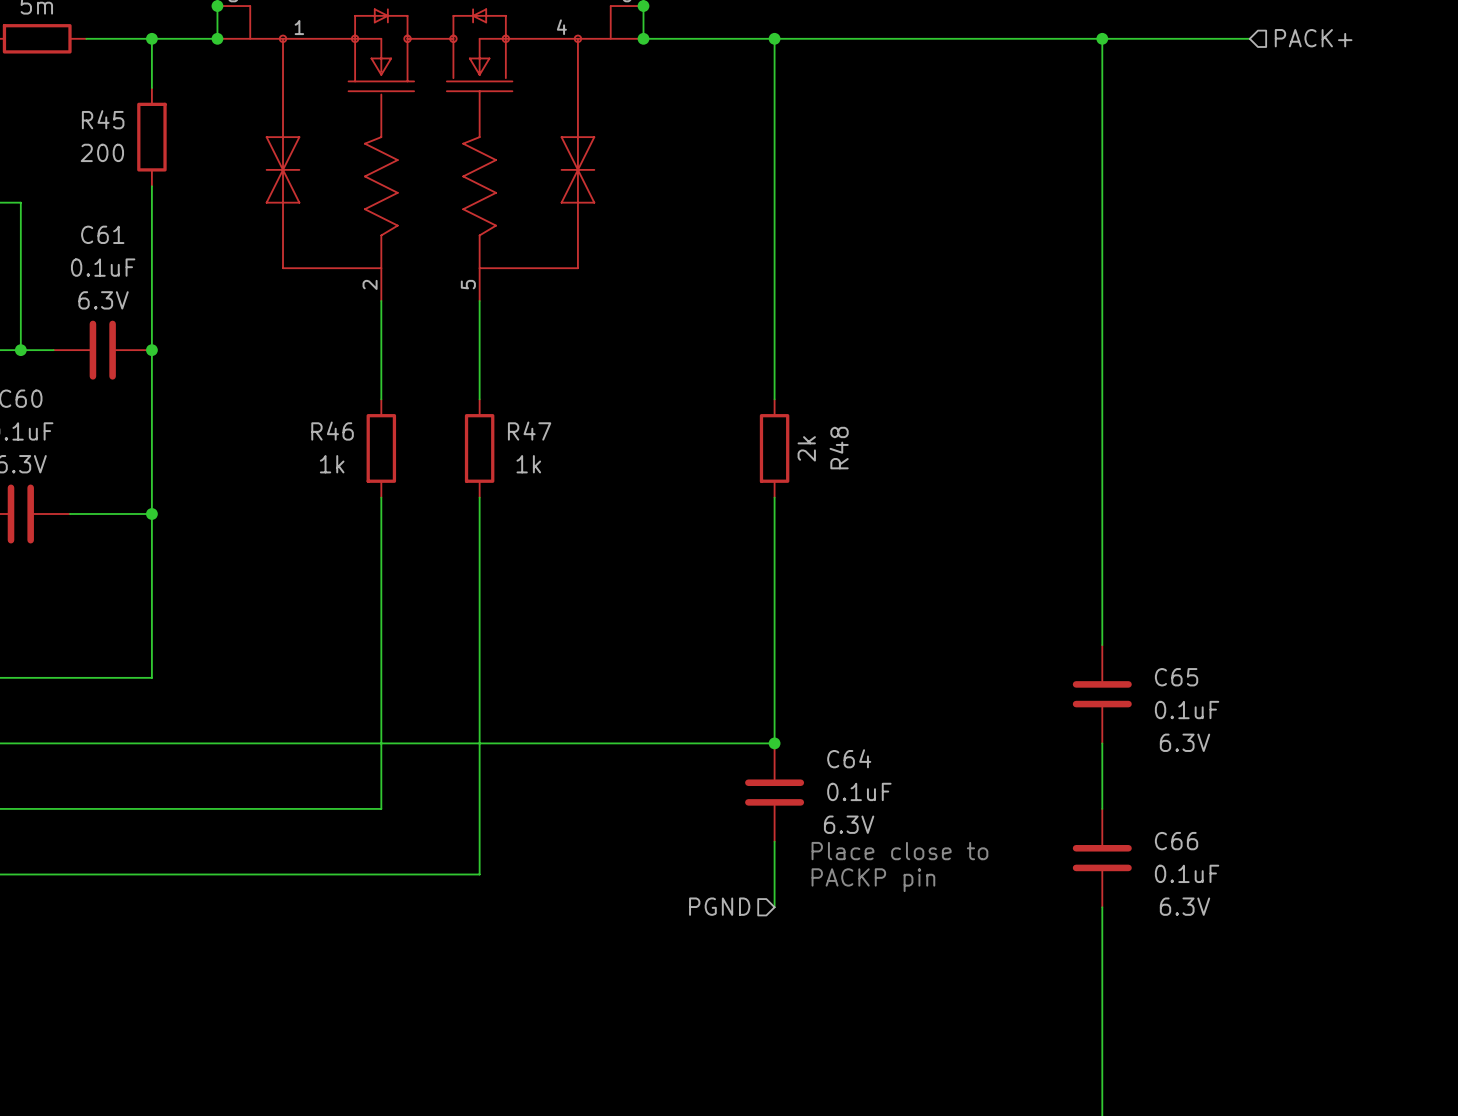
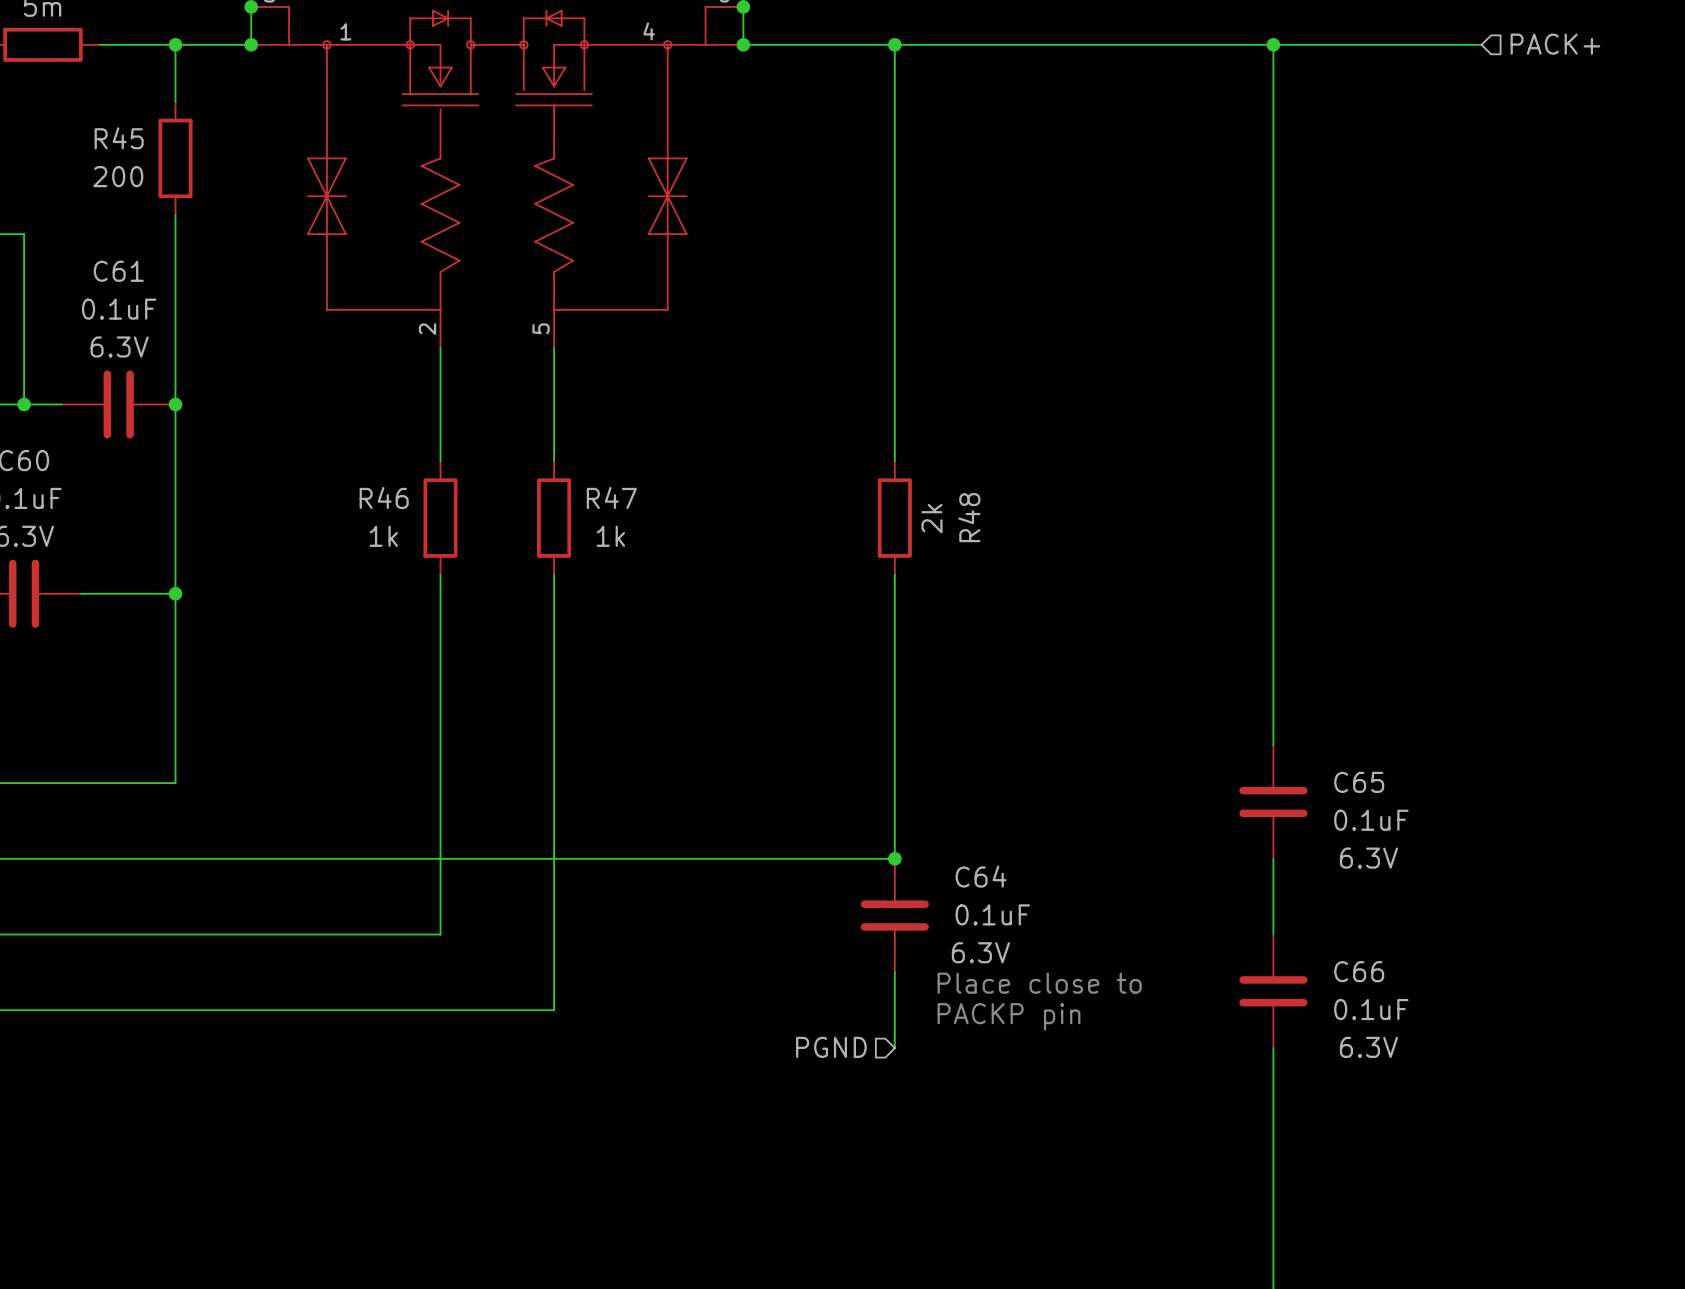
wire: none -> (1443, 44) (1481, 44)
hierarchical label position: PACK+ (1313, 38) -> PACK+ (1555, 44)

